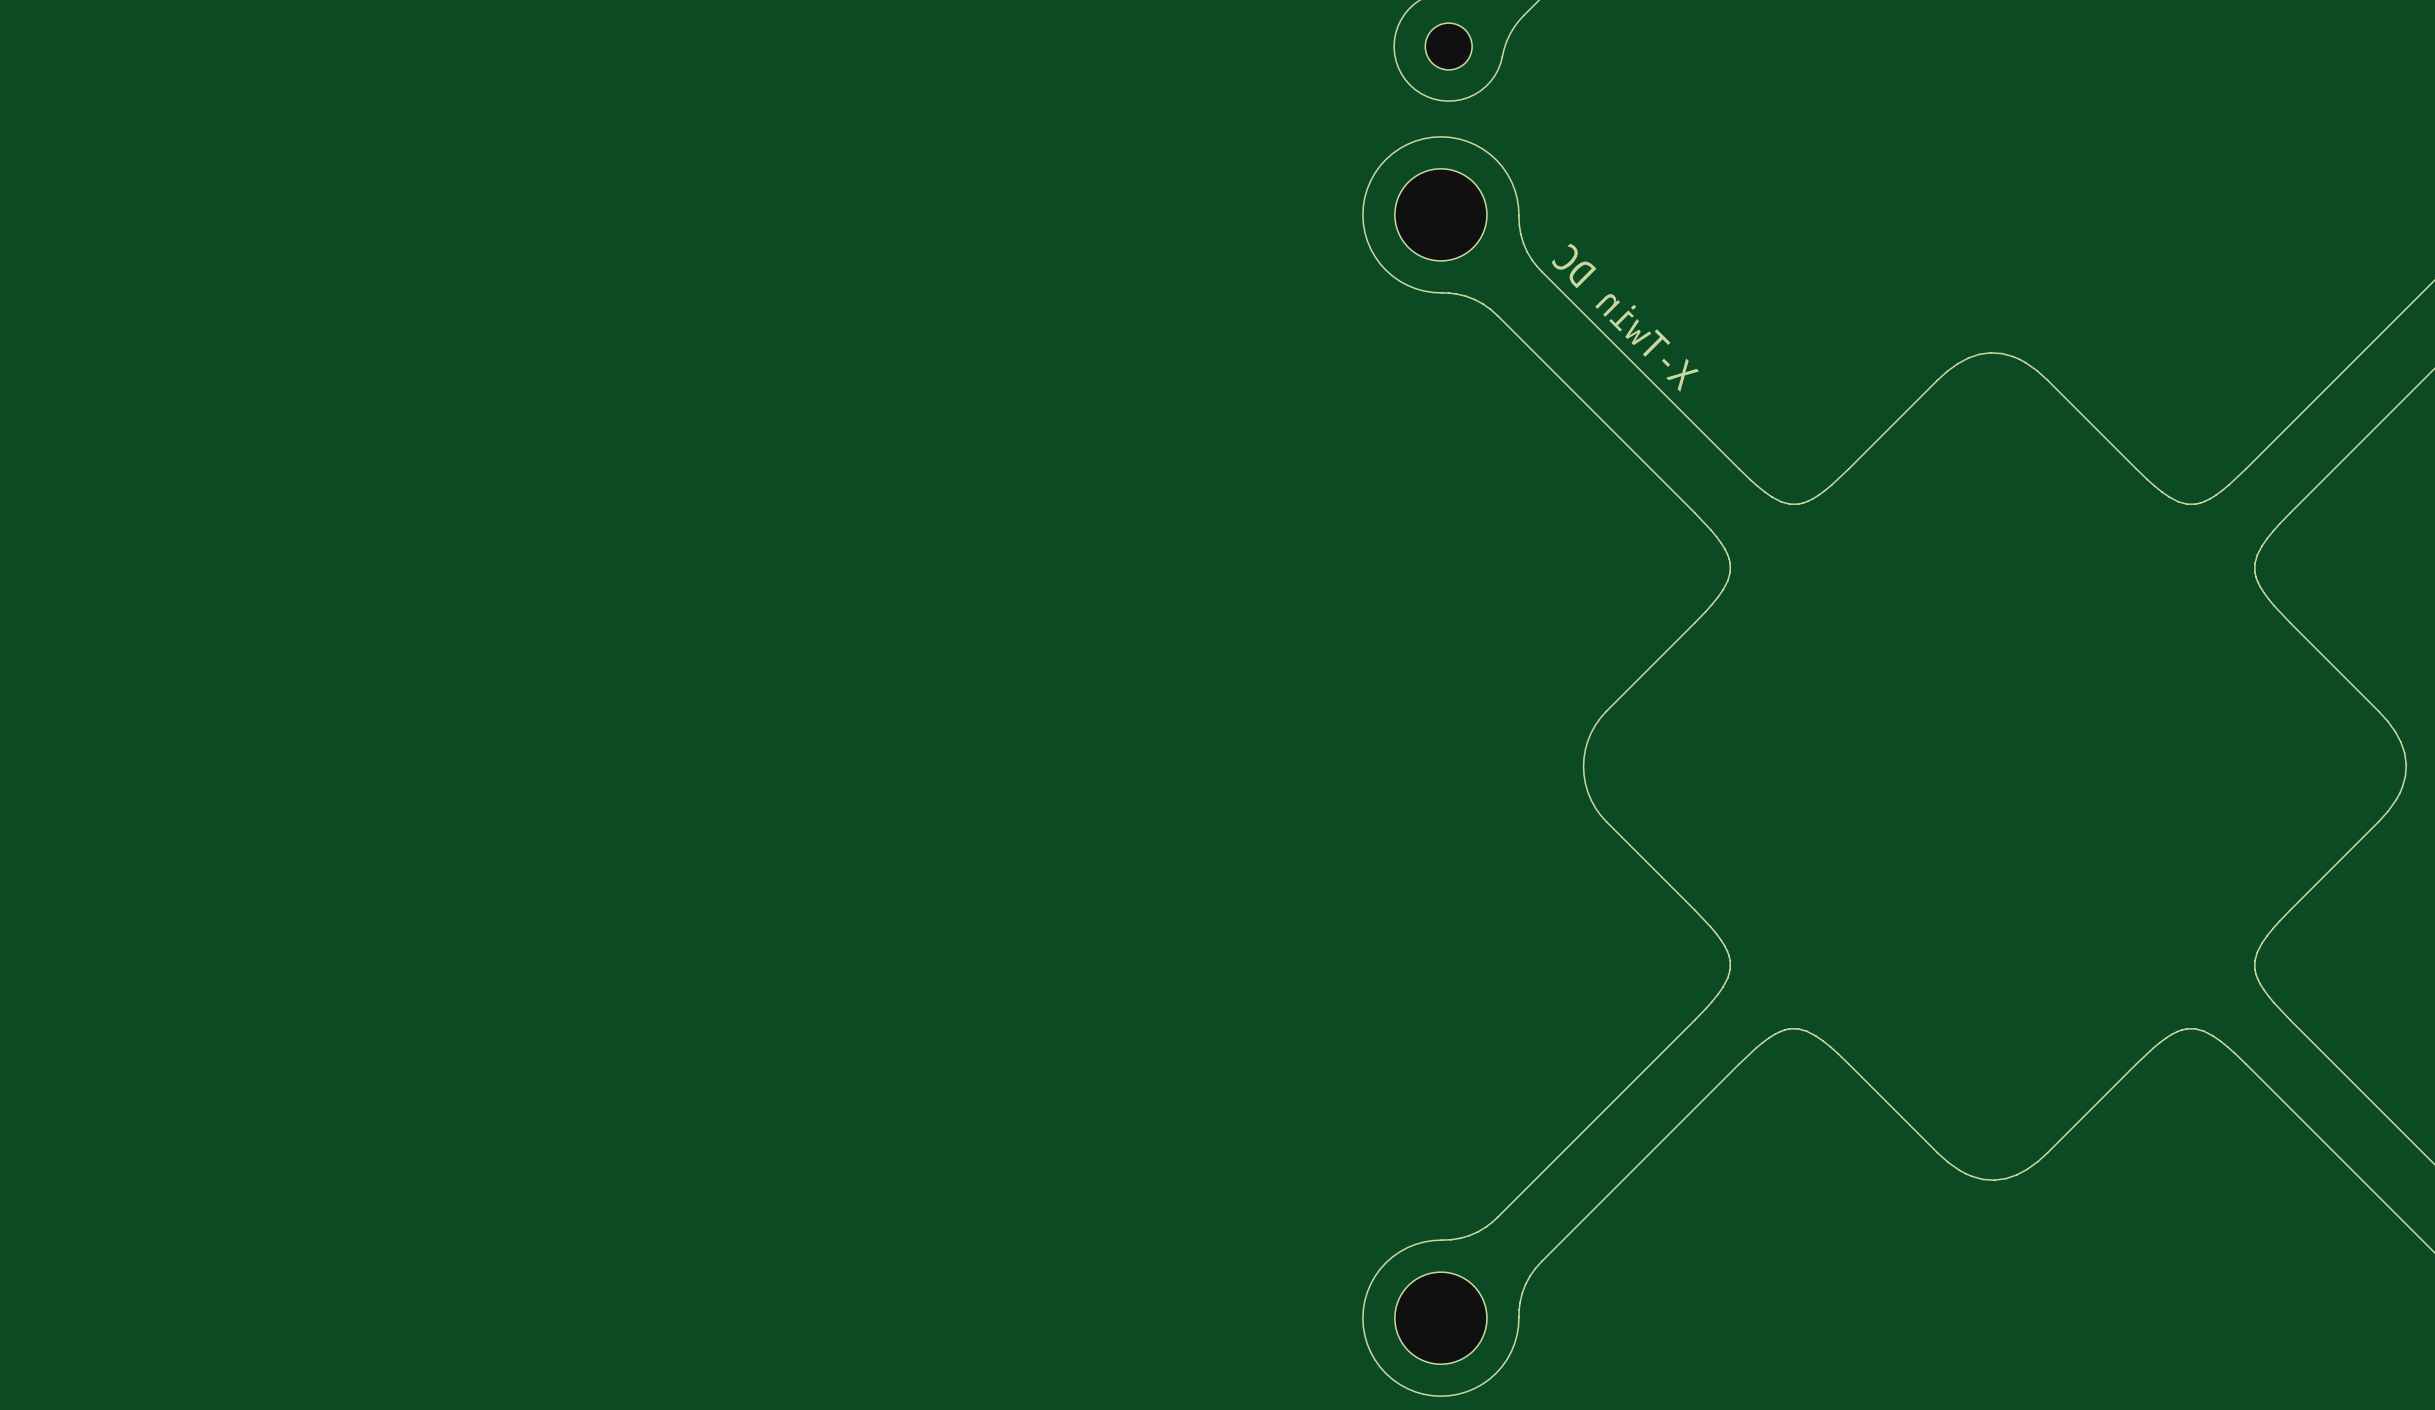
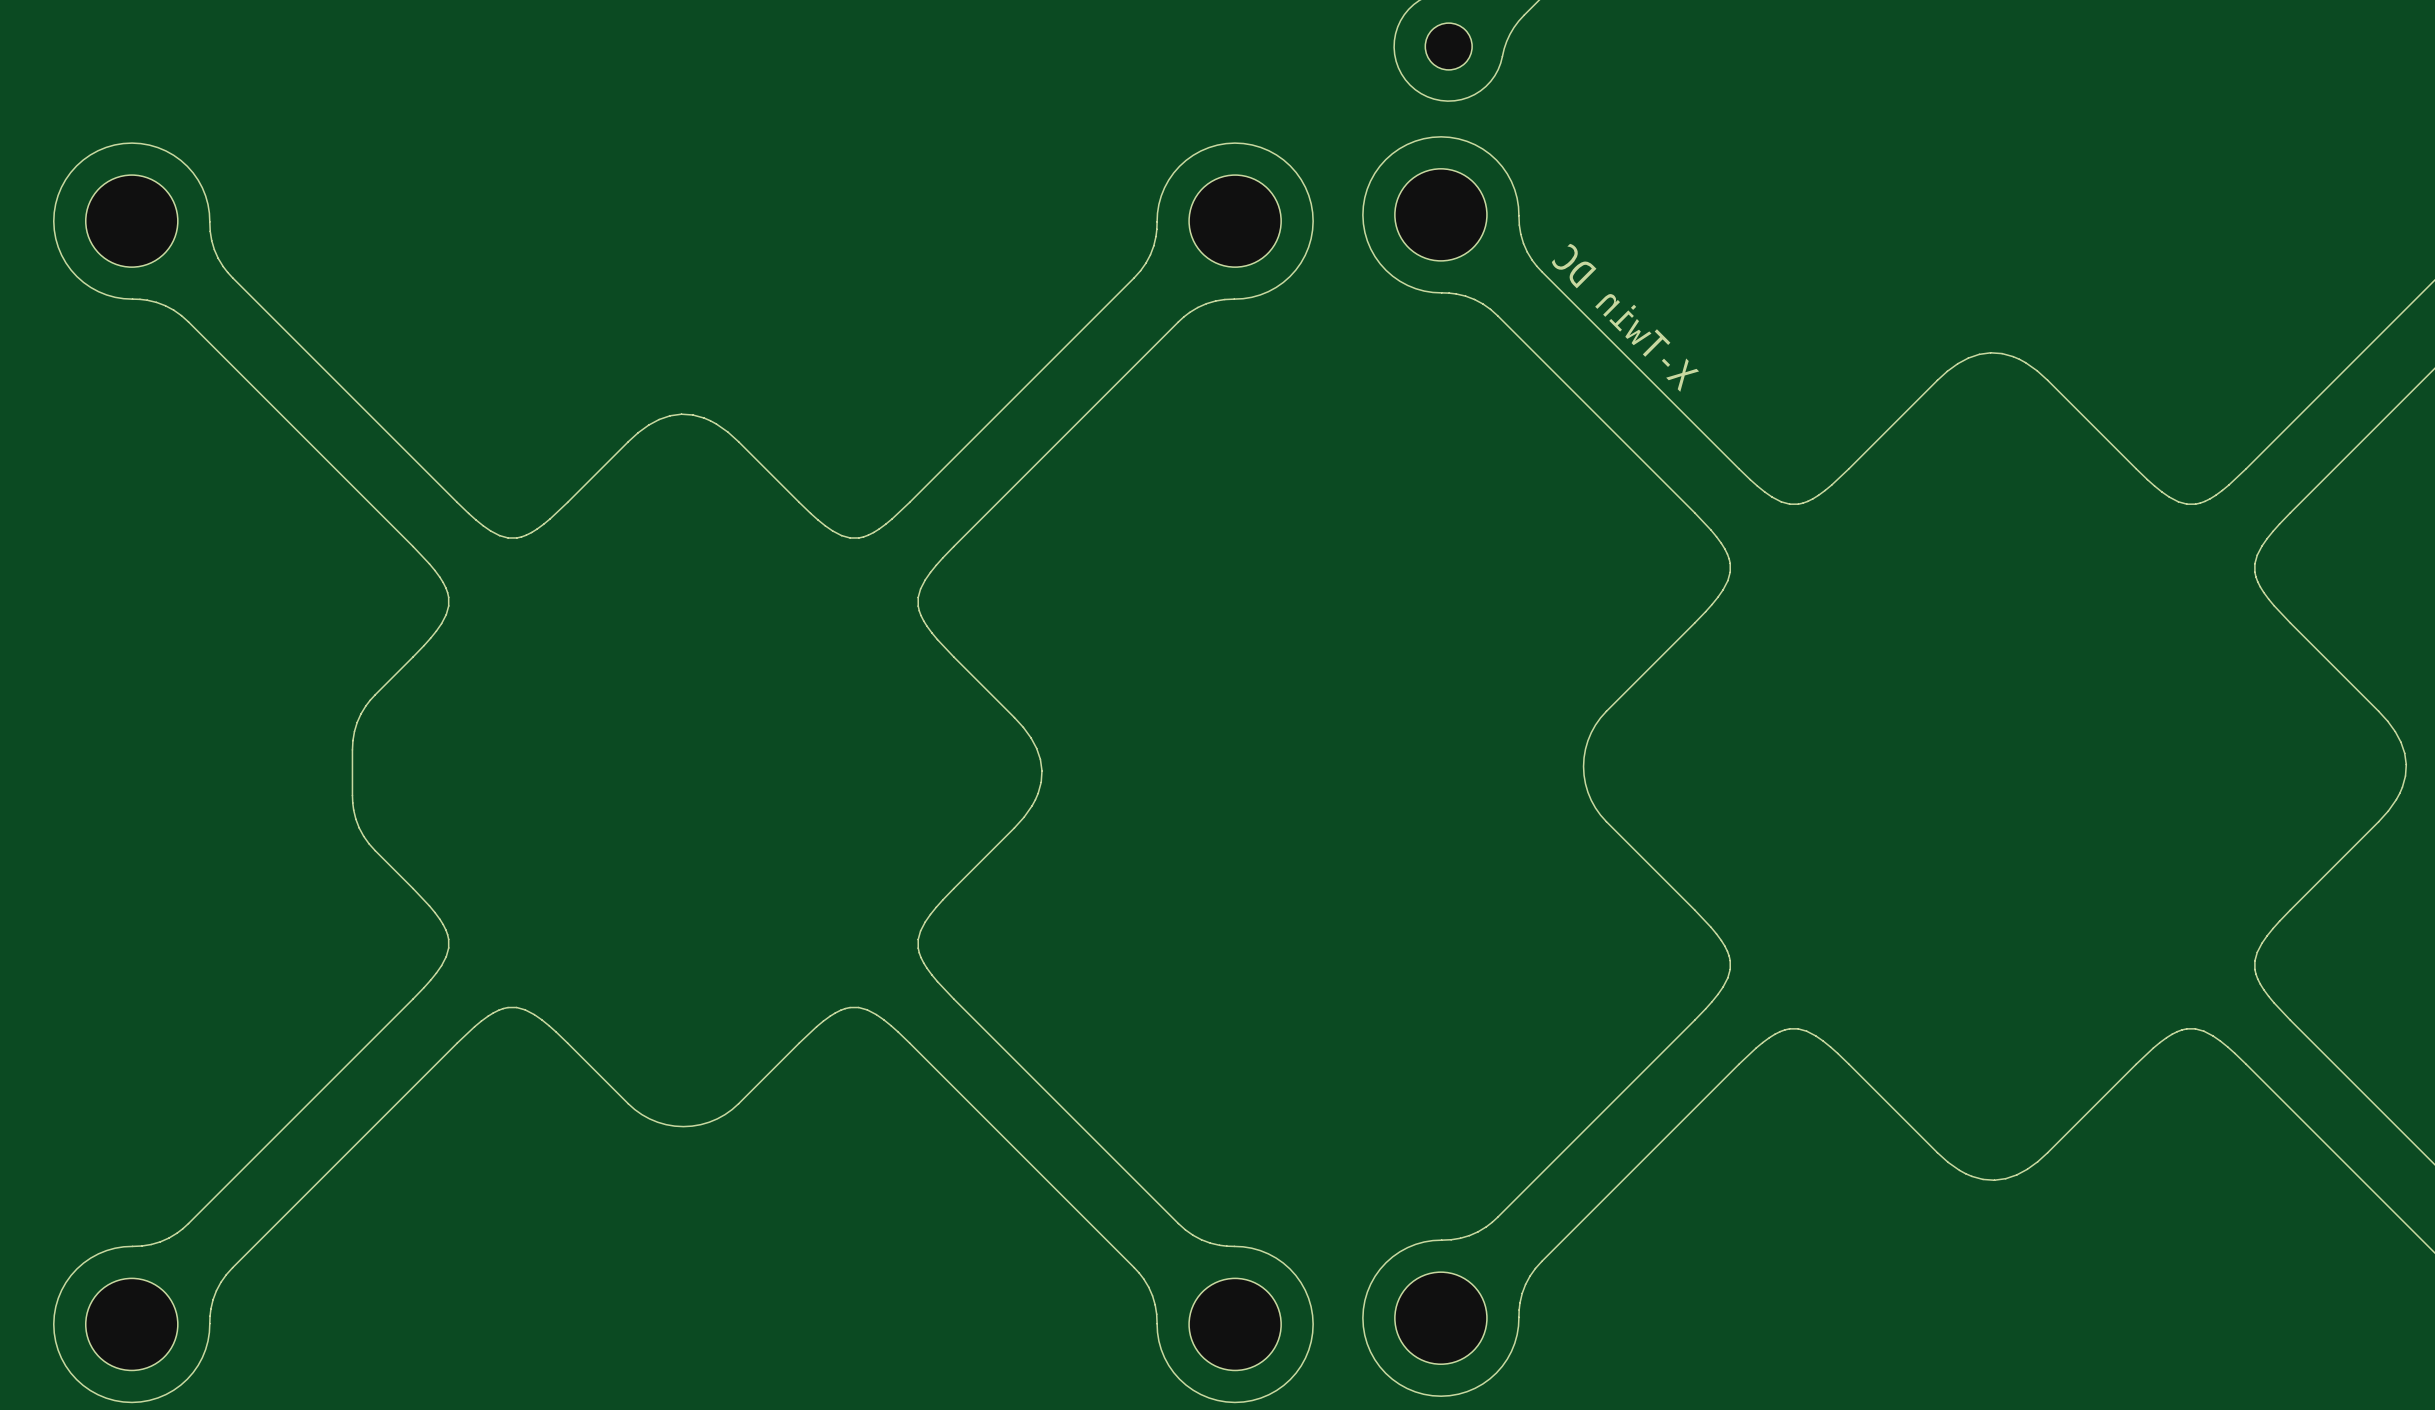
hole: none -> (131, 221)
board edge: none -> (1157, 221) (1155, 236) (1150, 254) (1134, 277) (909, 502) (885, 524) (868, 535) (850, 538) (832, 530) (810, 513) (727, 432) (704, 418) (681, 414) (670, 415) (648, 425) (628, 441) (543, 524) (526, 535) (508, 538) (490, 530) (468, 513) (227, 272) (214, 249) (210, 231) (208, 204) (202, 187) (193, 172) (180, 160) (166, 150) (149, 145) (123, 143) (98, 150) (76, 165) (61, 187) (54, 212) (55, 238) (61, 255) (71, 270) (83, 282) (98, 291) (115, 297) (156, 302) (181, 315) (429, 563) (445, 587) (448, 605) (441, 623) (430, 638) (365, 705) (357, 722) (352, 749) (352, 802) (359, 828) (369, 843) (429, 905) (439, 919) (448, 939) (446, 956) (436, 973) (413, 998) (183, 1228) (160, 1241) (142, 1245) (115, 1248) (98, 1253) (83, 1263) (71, 1275) (61, 1290) (55, 1306) (54, 1332) (61, 1358) (76, 1379) (98, 1394) (123, 1401) (149, 1400) (166, 1394) (180, 1385) (193, 1372) (202, 1357) (208, 1341) (213, 1299) (226, 1274) (474, 1026) (498, 1010) (516, 1007) (534, 1014) (549, 1025) (634, 1109) (657, 1122) (683, 1126) (709, 1122) (732, 1109) (799, 1043) (829, 1016) (850, 1007) (867, 1009) (883, 1019) (909, 1043) (1139, 1273) (1152, 1295) (1156, 1314) (1158, 1341) (1164, 1357) (1173, 1372) (1186, 1385) (1200, 1394) (1217, 1400) (1243, 1401) (1268, 1394) (1290, 1379) (1305, 1358) (1312, 1332) (1311, 1306) (1305, 1290) (1295, 1275) (1283, 1263) (1268, 1253) (1251, 1248) (1210, 1243) (1185, 1229) (953, 998) (927, 968) (918, 948) (920, 930) (930, 914) (1014, 827) (1032, 805) (1038, 793) (1042, 770) (1036, 748) (1023, 727) (937, 639) (923, 620) (919, 610) (918, 597) (925, 579) (953, 546) (1183, 316) (1197, 307) (1215, 301) (1260, 294) (1276, 287) (1289, 276) (1305, 255) (1311, 238) (1313, 221) (1311, 203) (1305, 187) (1290, 165) (1268, 150) (1252, 145) (1234, 143) (1217, 145) (1200, 150) (1179, 166) (1168, 180) (1161, 195) (1157, 221)
hole: none -> (1235, 221)
hole: none -> (131, 1324)
hole: none -> (1235, 1324)

